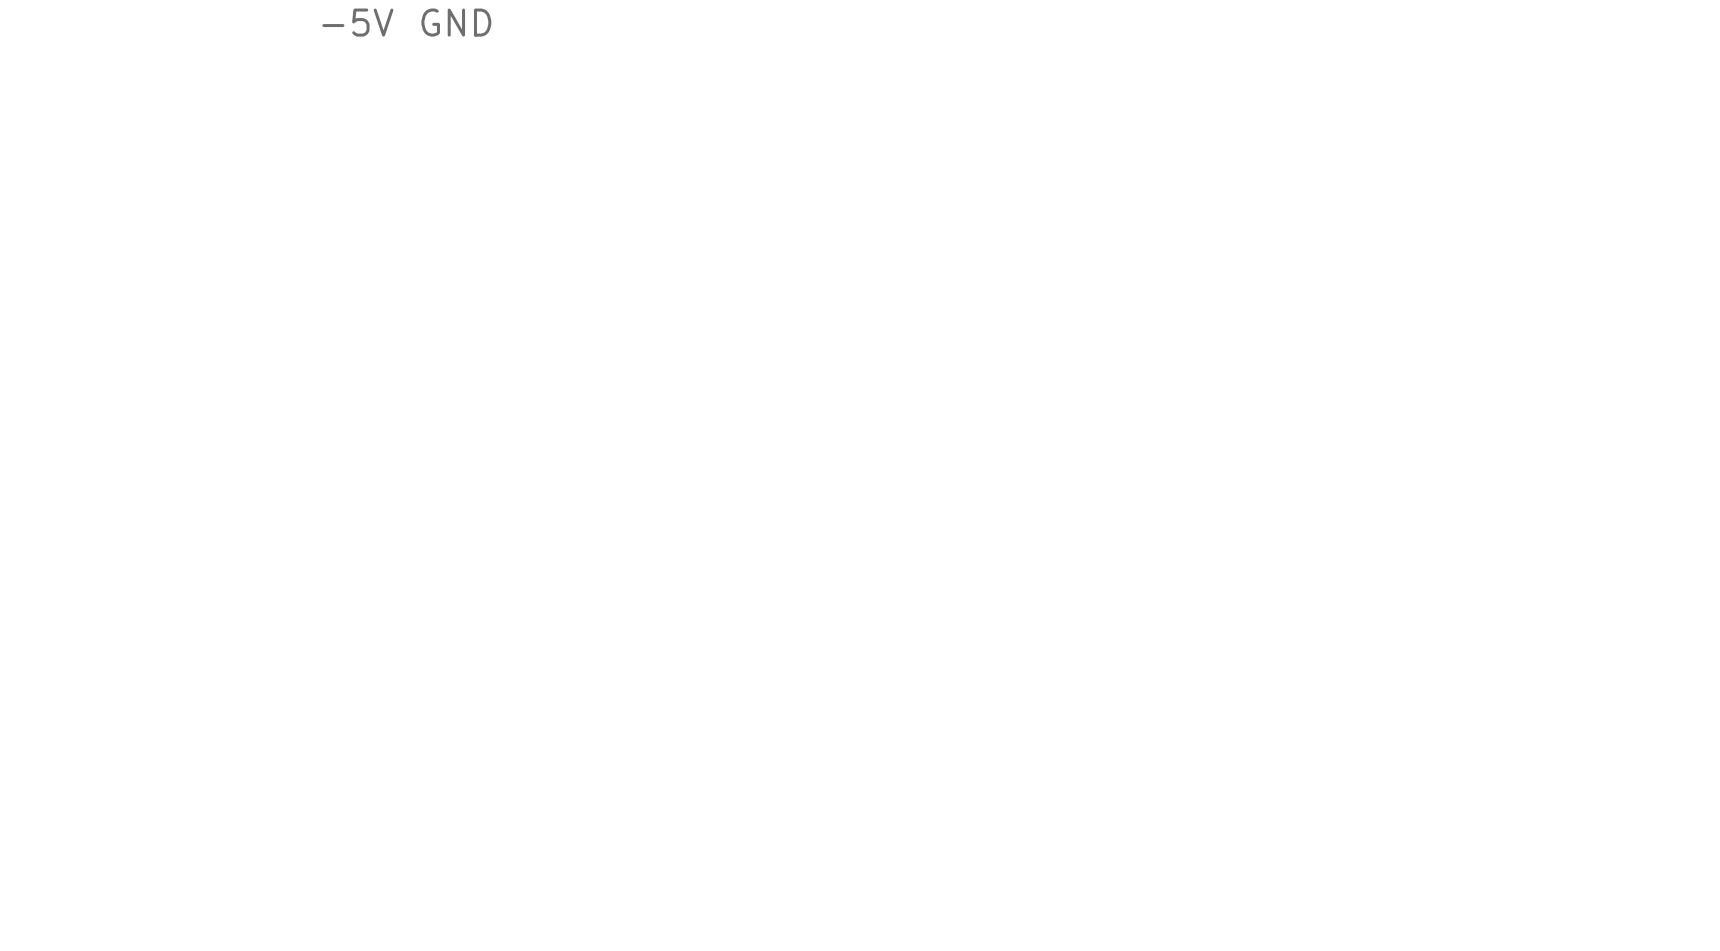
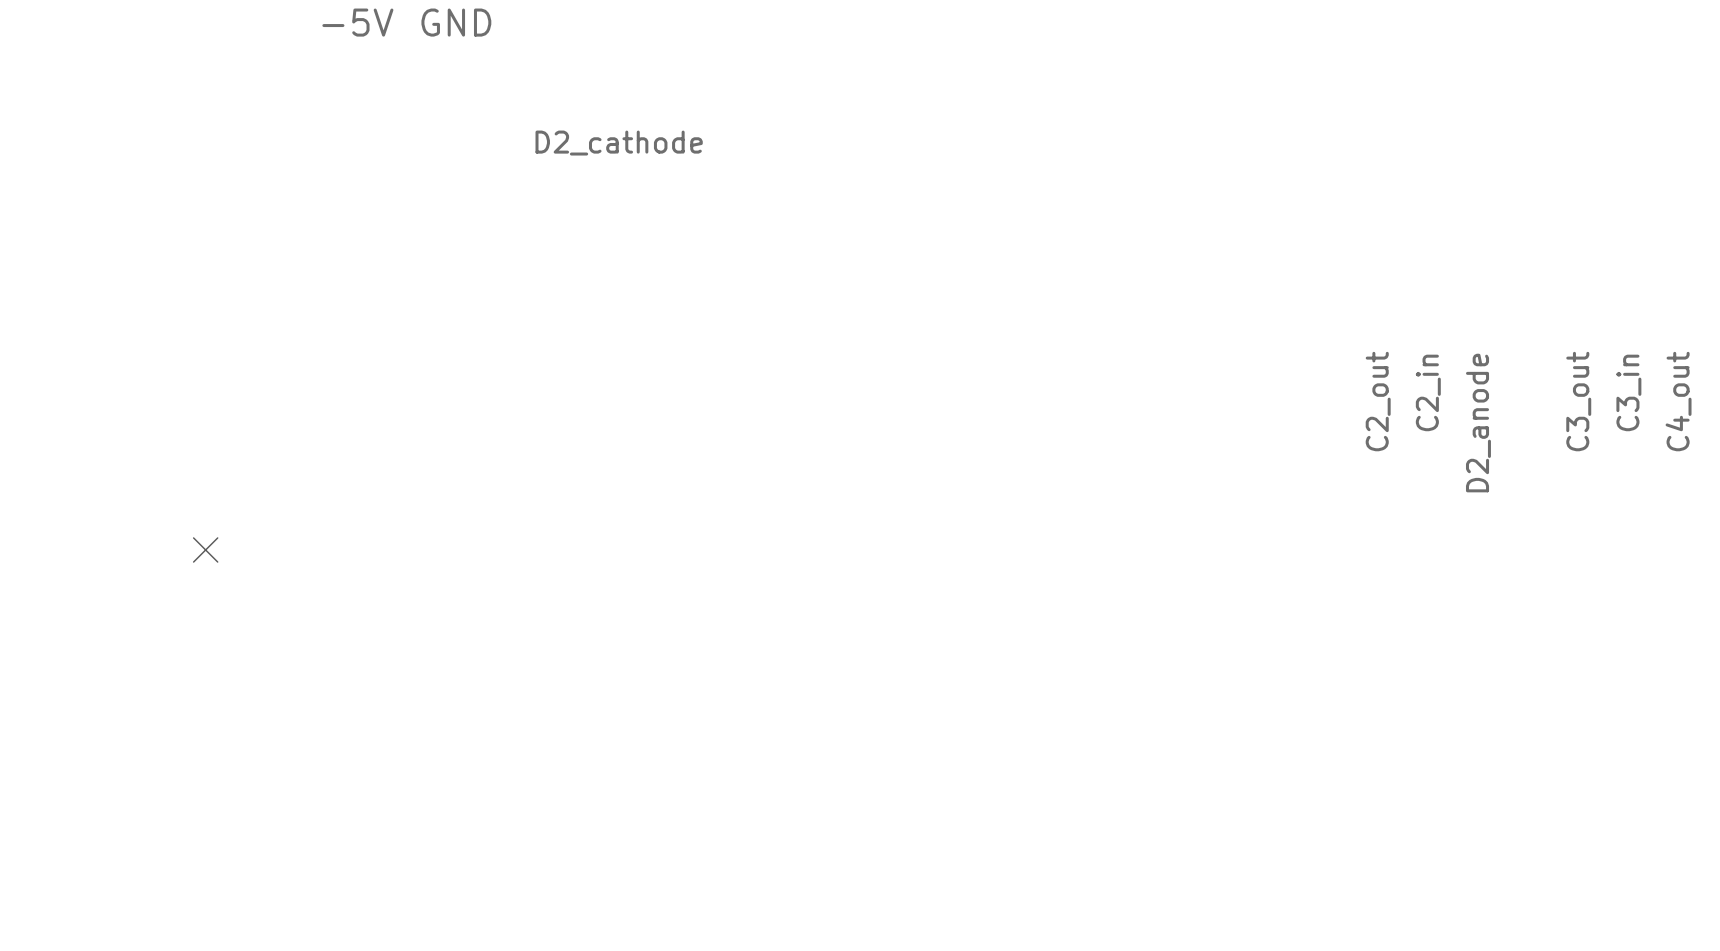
label: none -> D2_cathode (619, 143)
label: none -> C2_in (1428, 392)
label: none -> C3_in (1628, 392)
label: none -> C2_out (1378, 401)
label: none -> C3_out (1578, 401)
label: none -> C4_out (1678, 401)
label: none -> D2_anode (1478, 423)
no-connect mark: none -> (205, 549)

